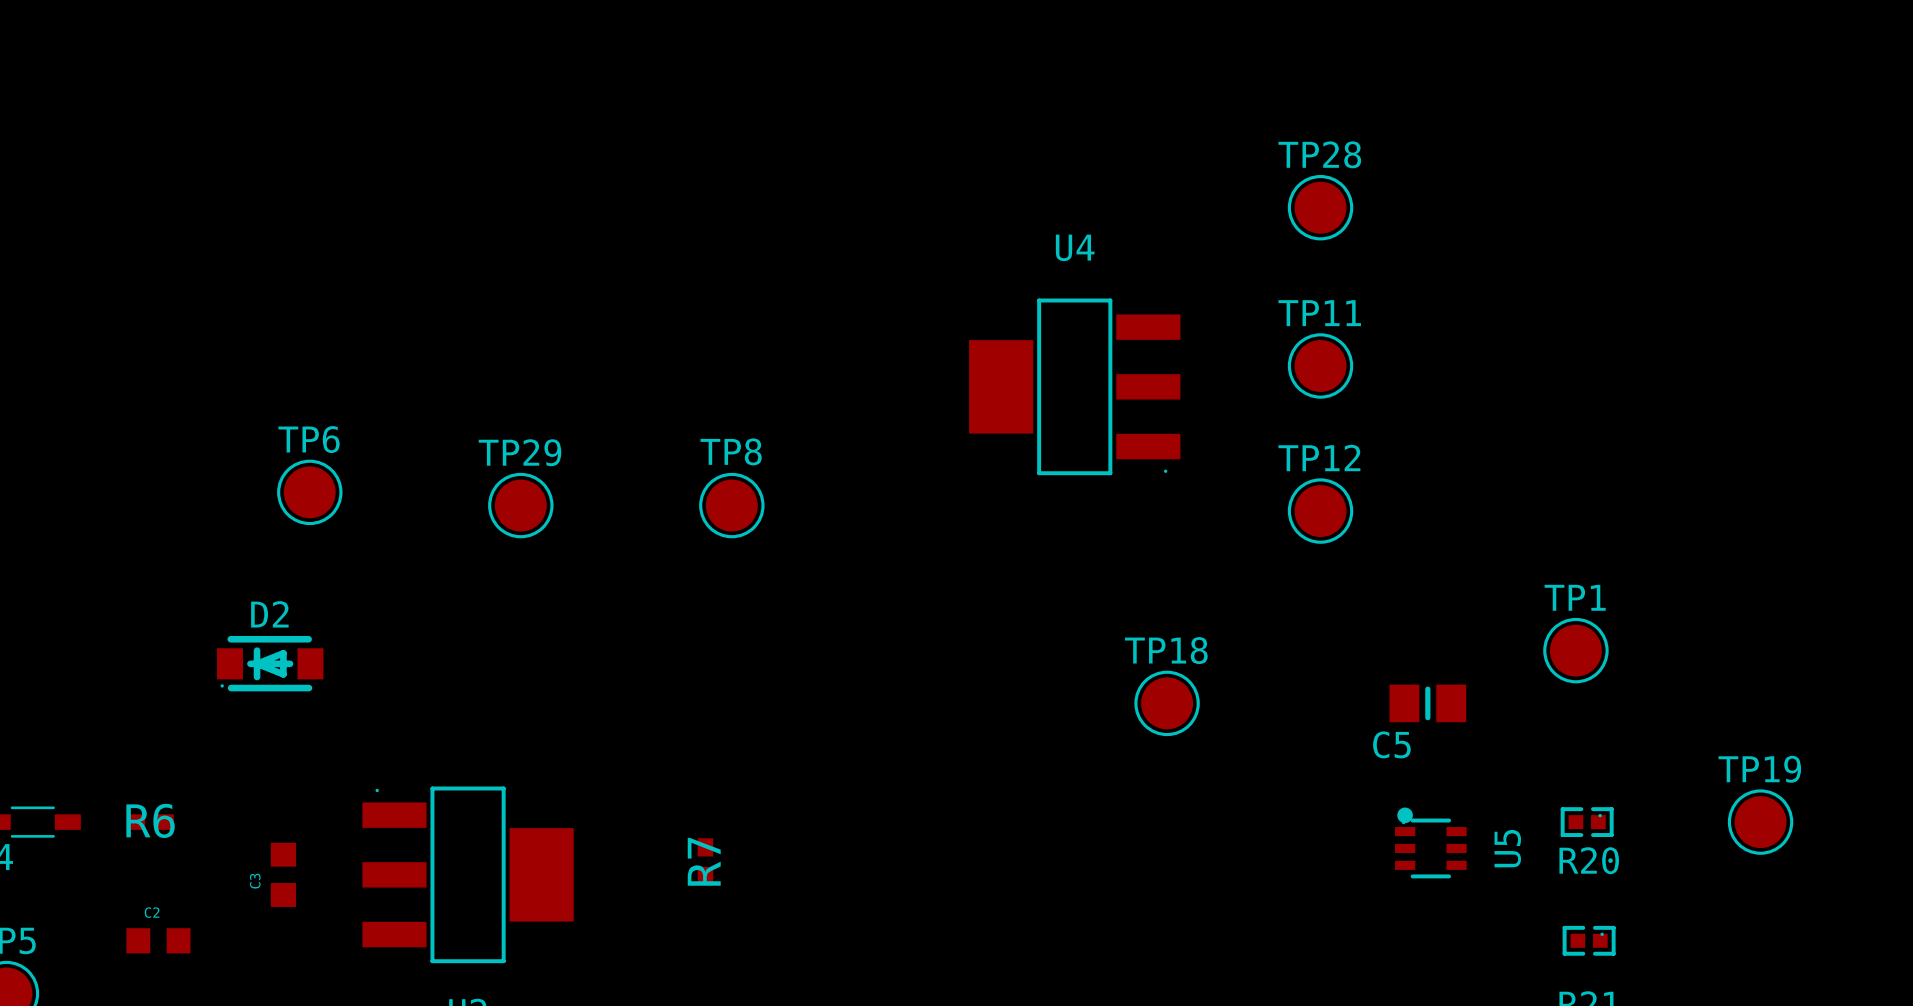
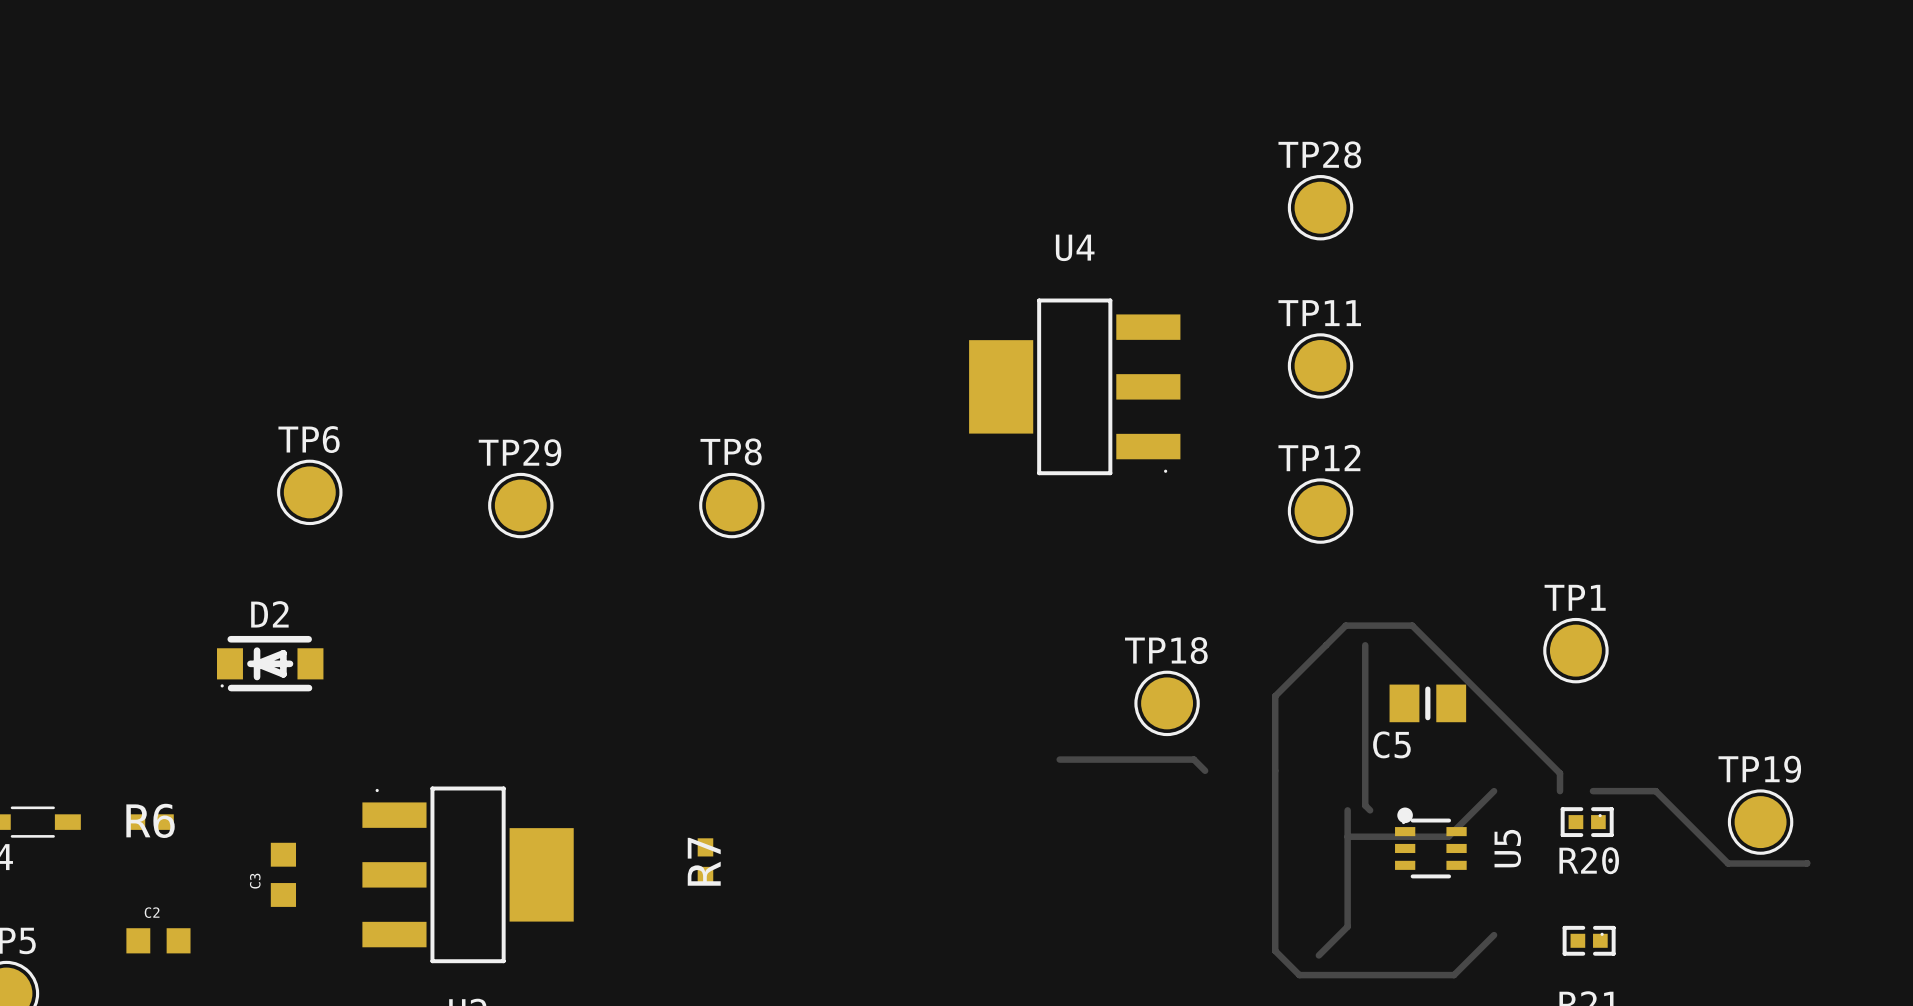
track: none -> (1365, 645) (1365, 805) (1370, 810)
track: none -> (1059, 759) (1193, 759) (1205, 770)
track: none -> (1494, 791) (1448, 836) (1347, 836)
track: none -> (1560, 791) (1560, 773) (1412, 625) (1345, 625) (1275, 696) (1275, 950) (1299, 975) (1454, 975) (1494, 935)
track: none -> (1592, 791) (1655, 791) (1728, 863) (1807, 863)
track: none -> (1347, 810) (1347, 926) (1318, 955)

